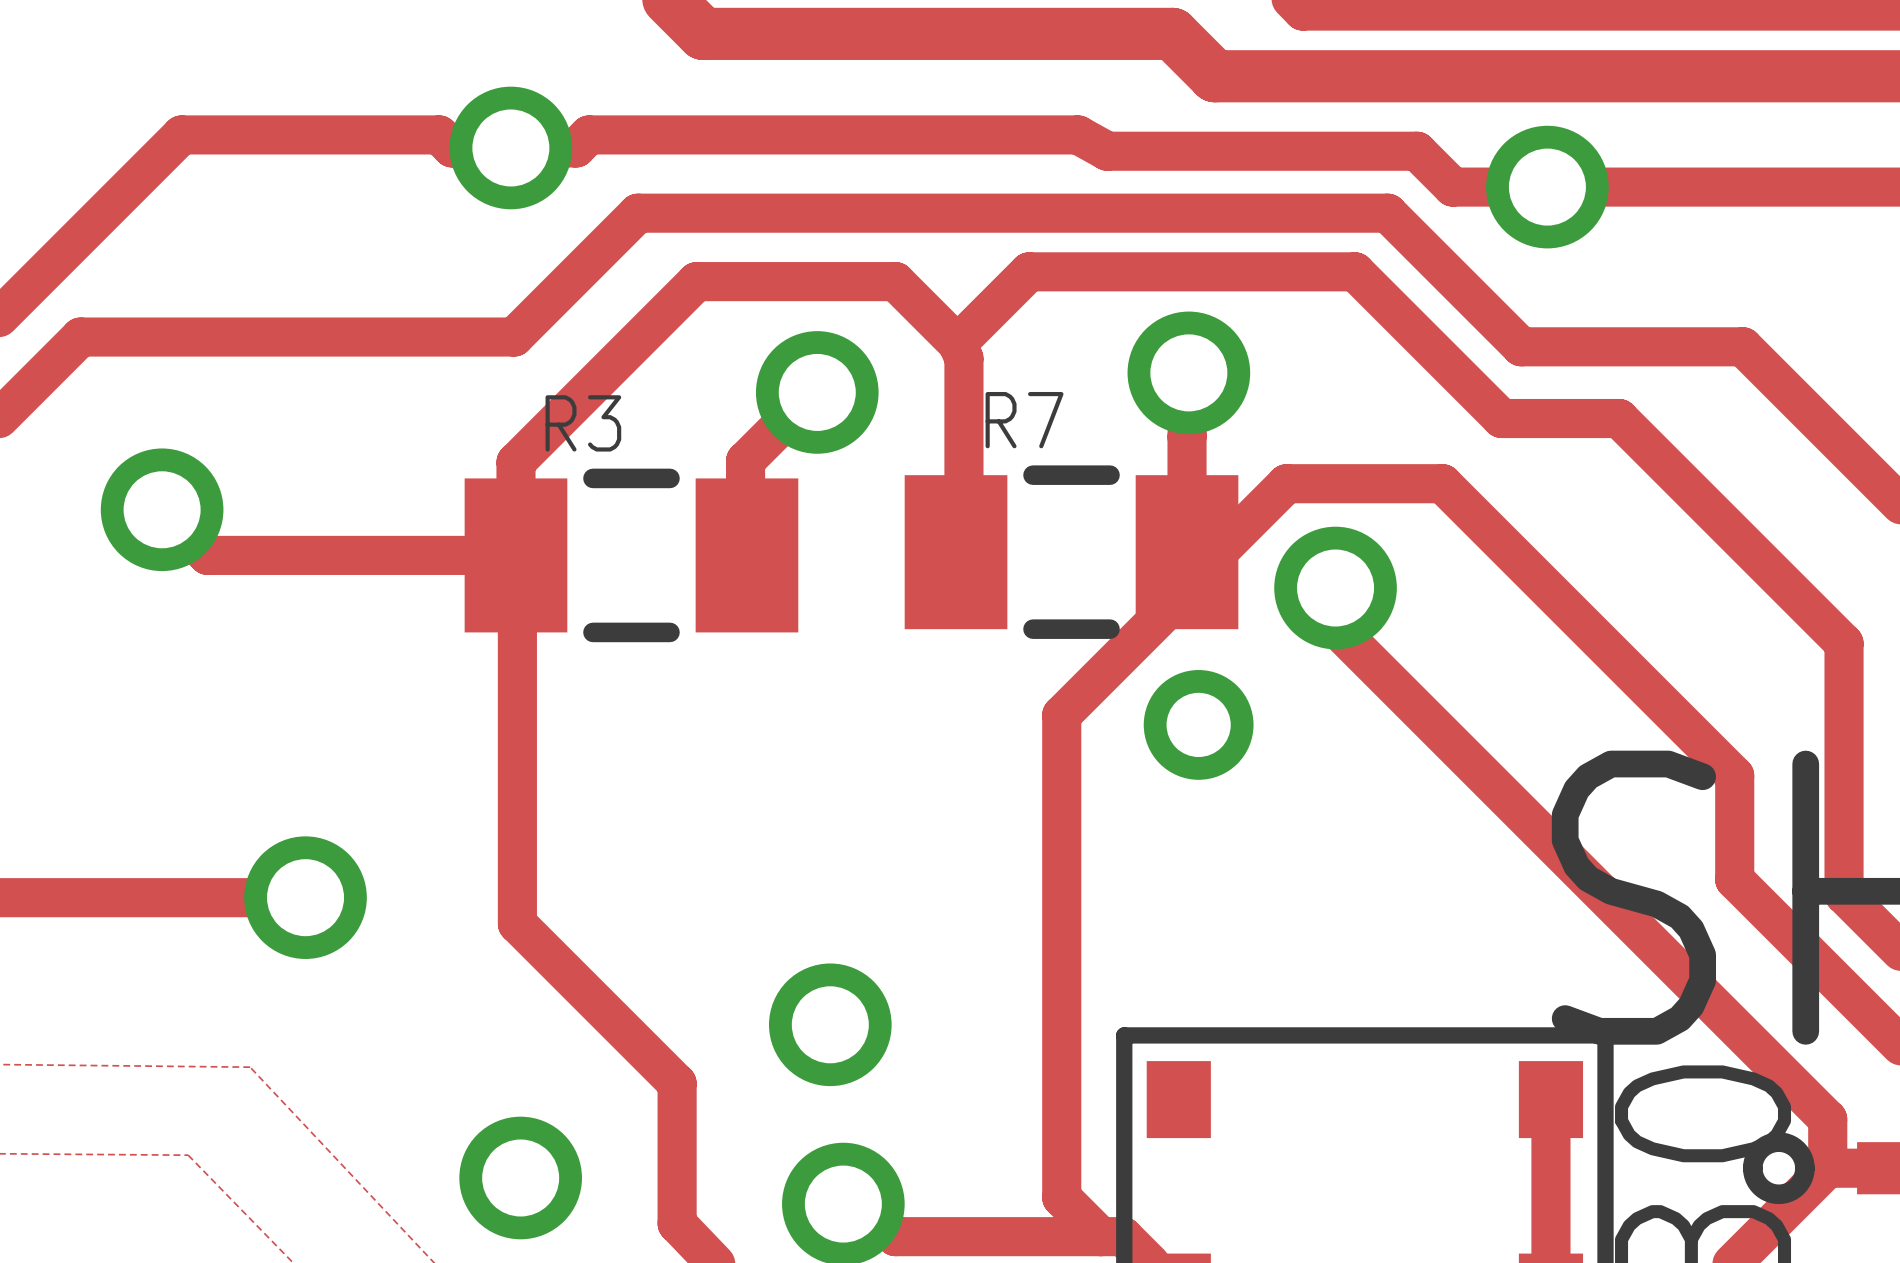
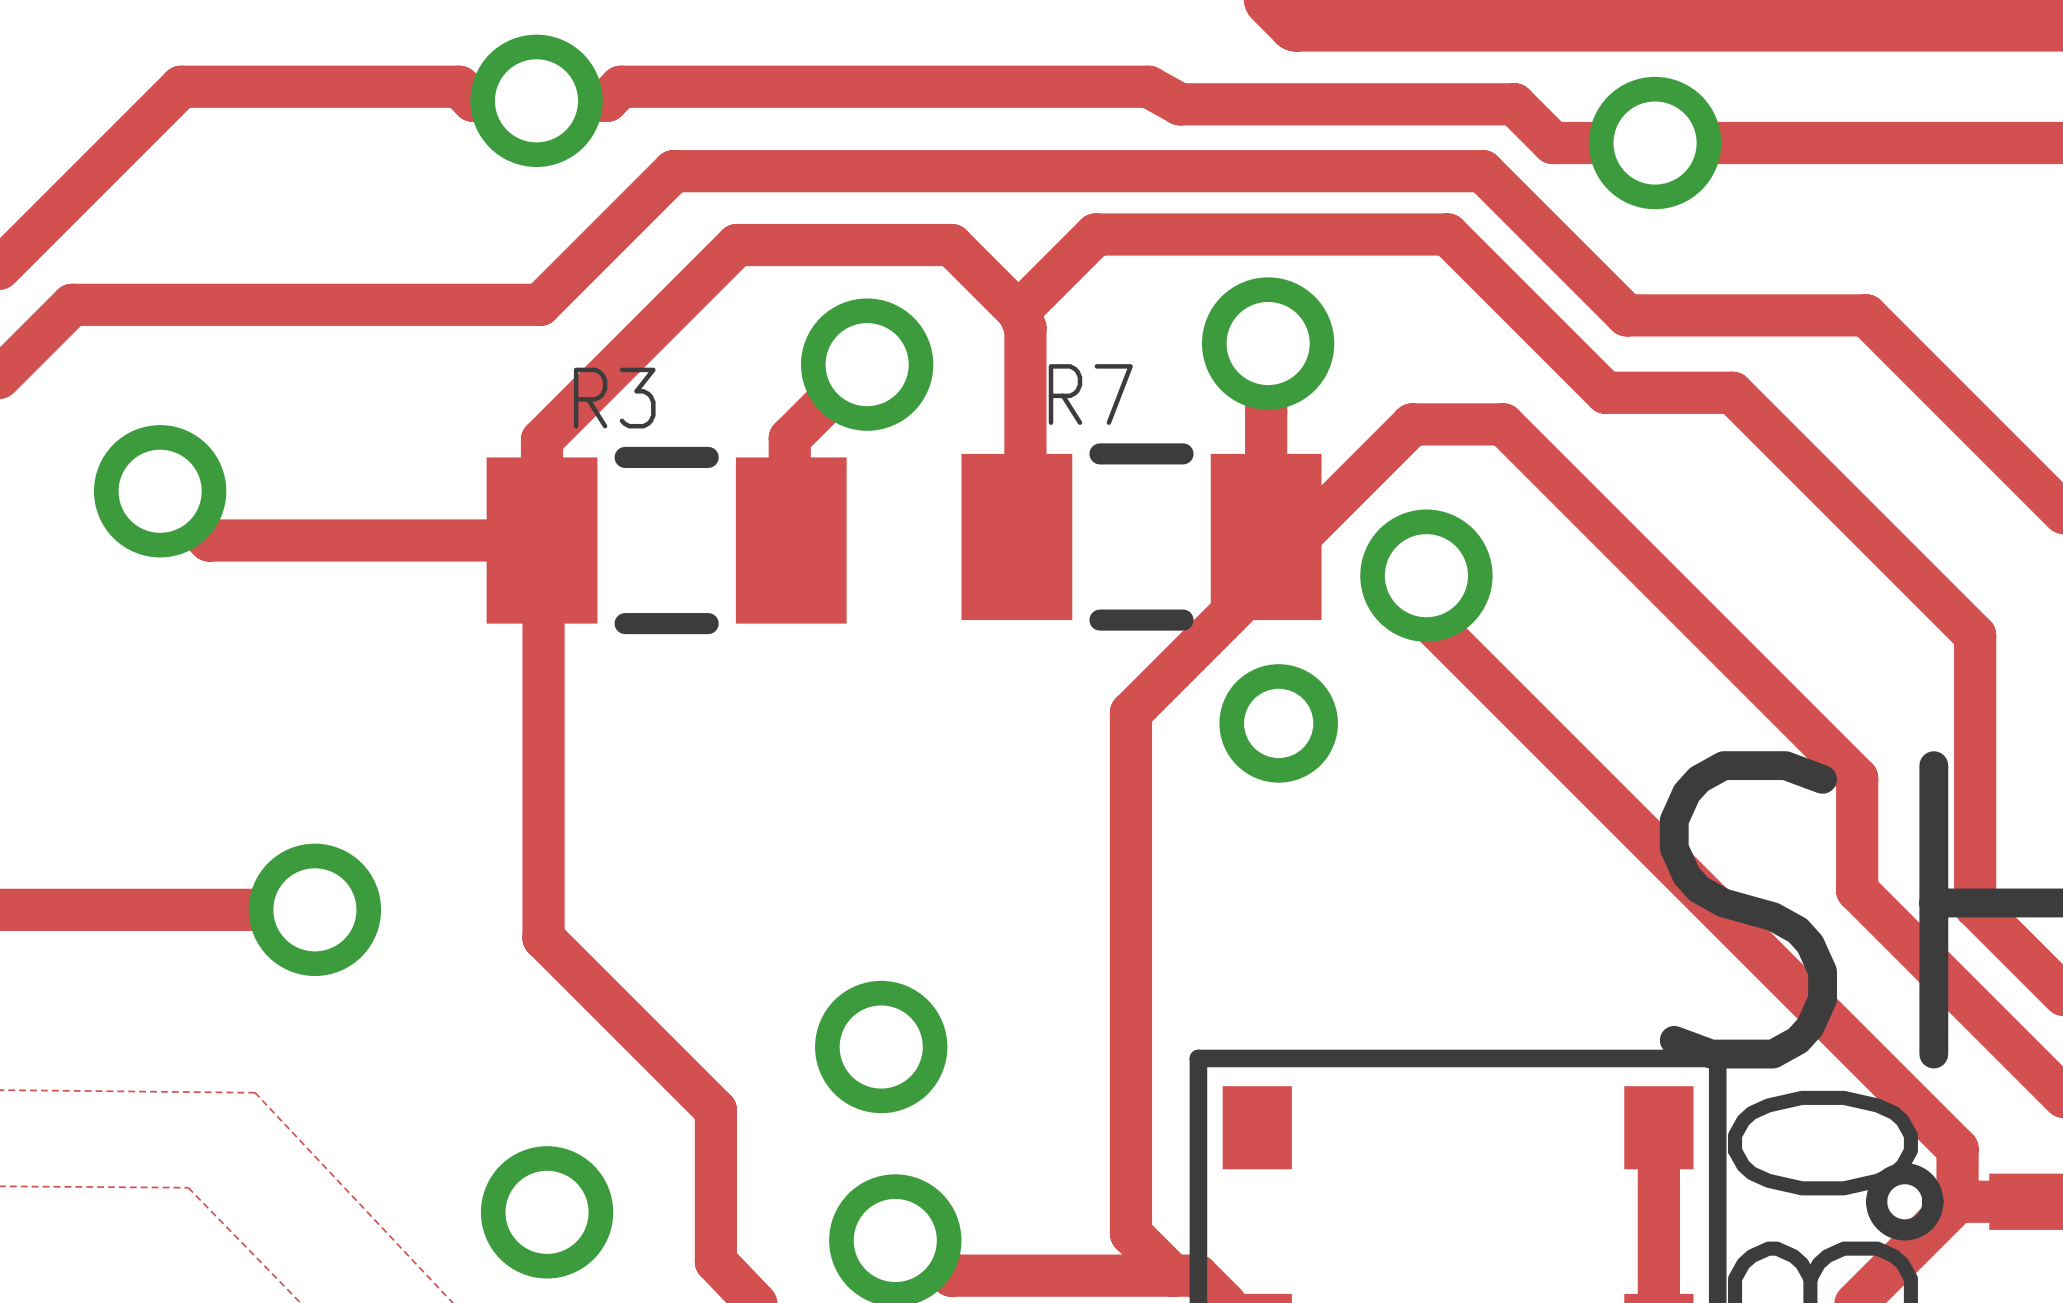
track: (1286, 483) (1442, 483) -> (1373, 463) (1412, 424) (1503, 424) (1541, 463)

